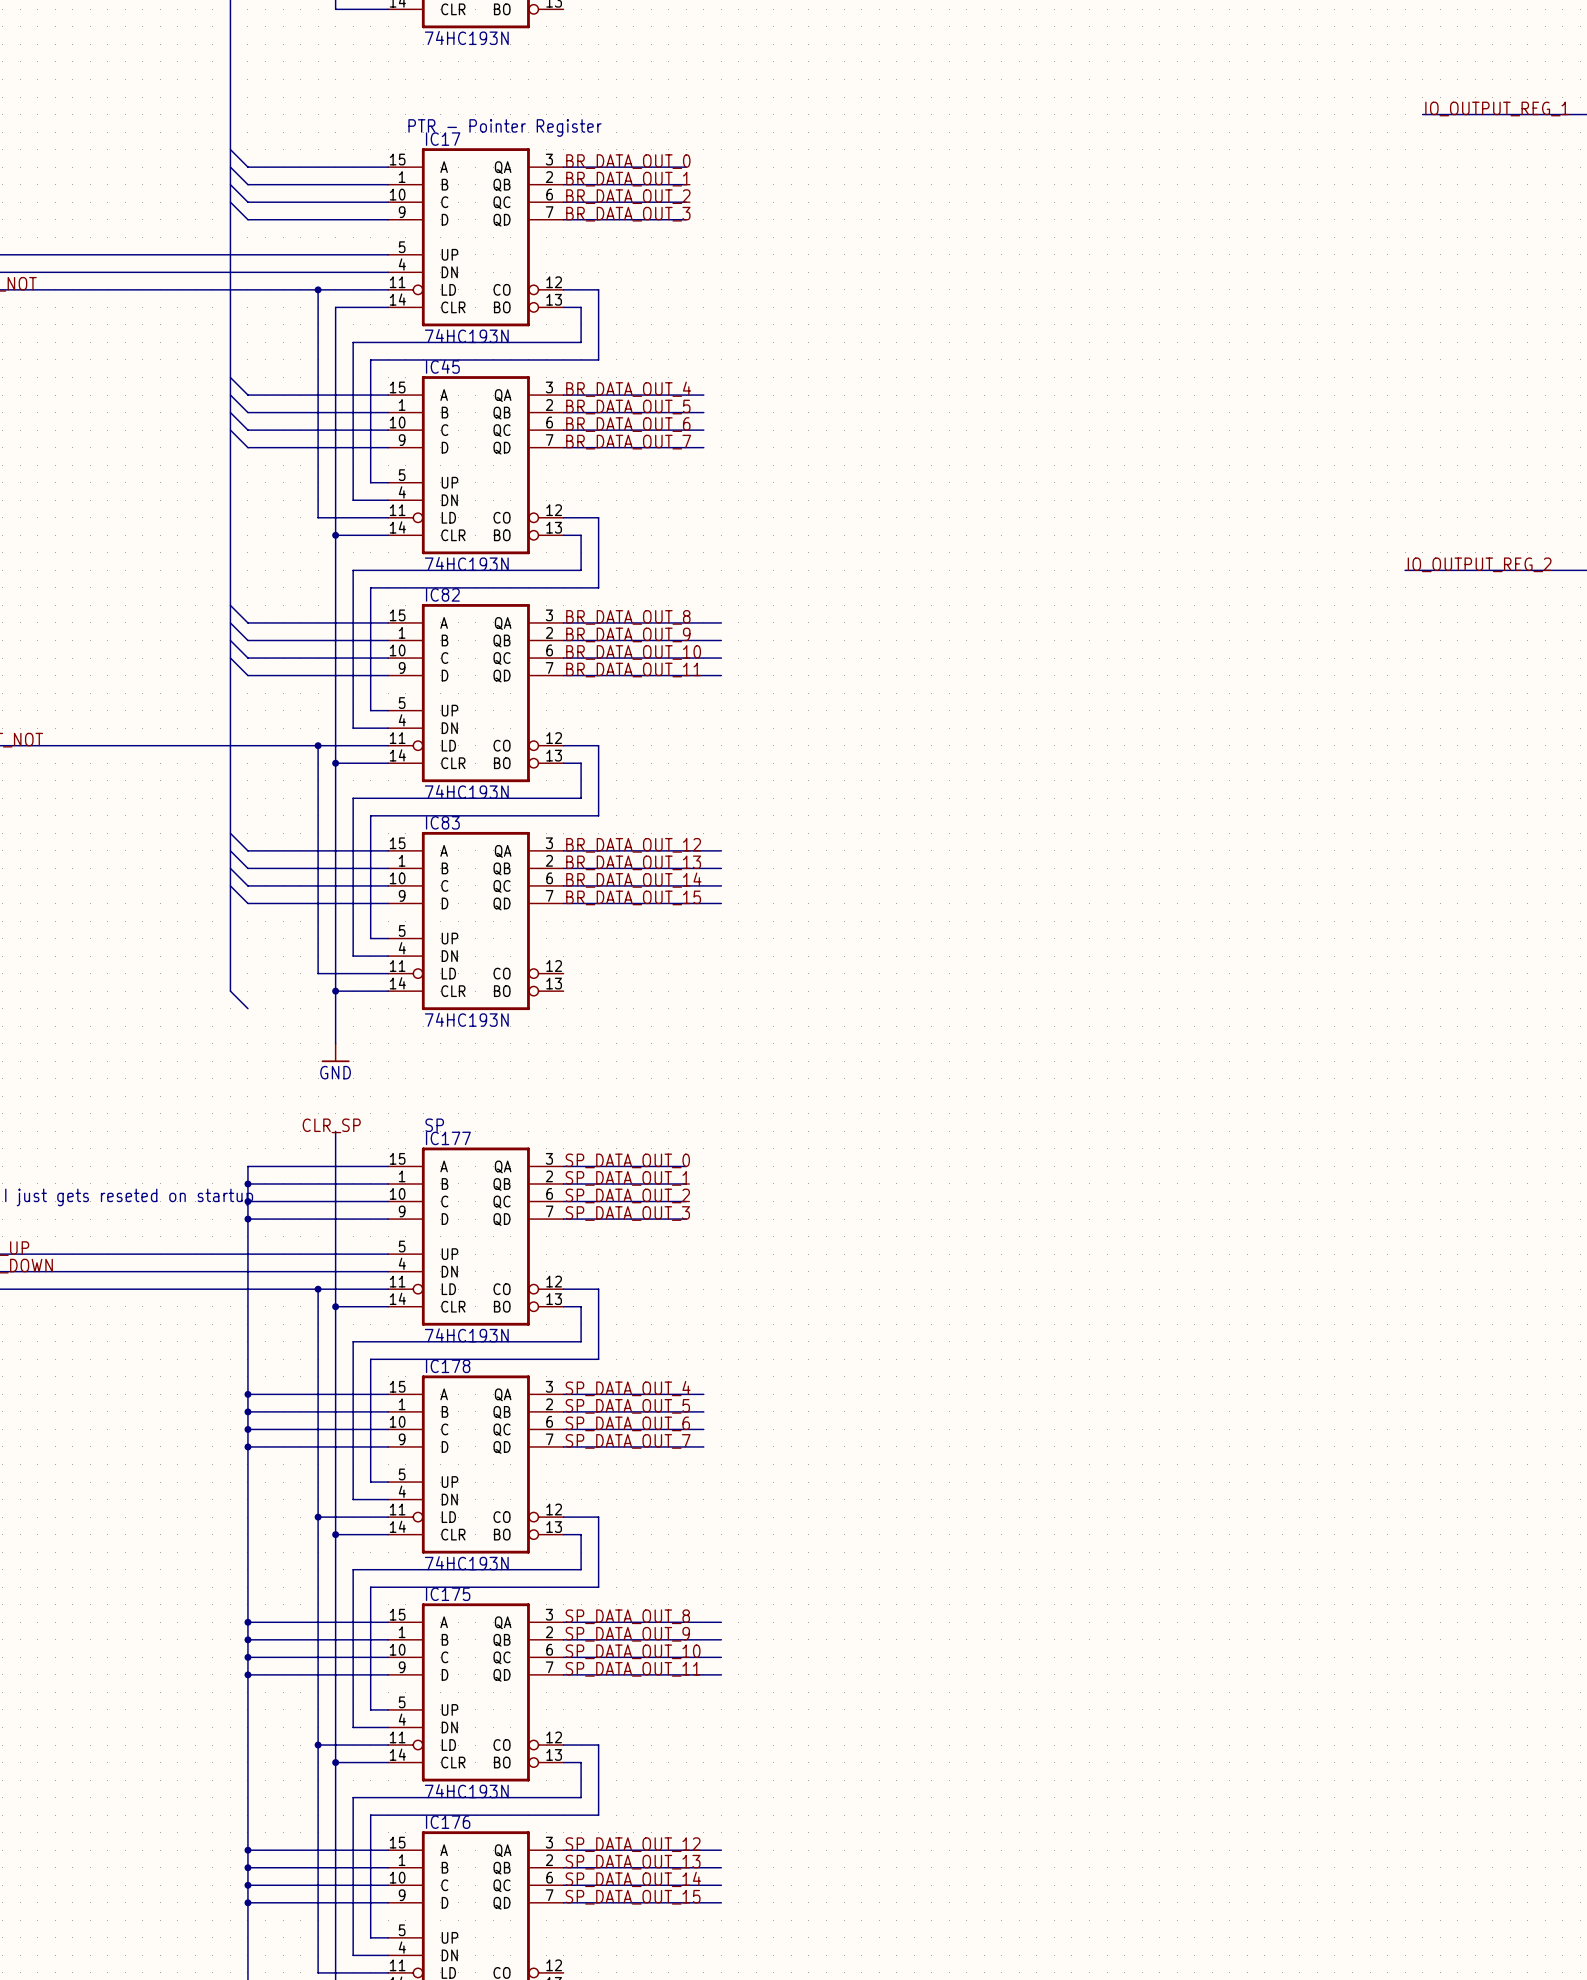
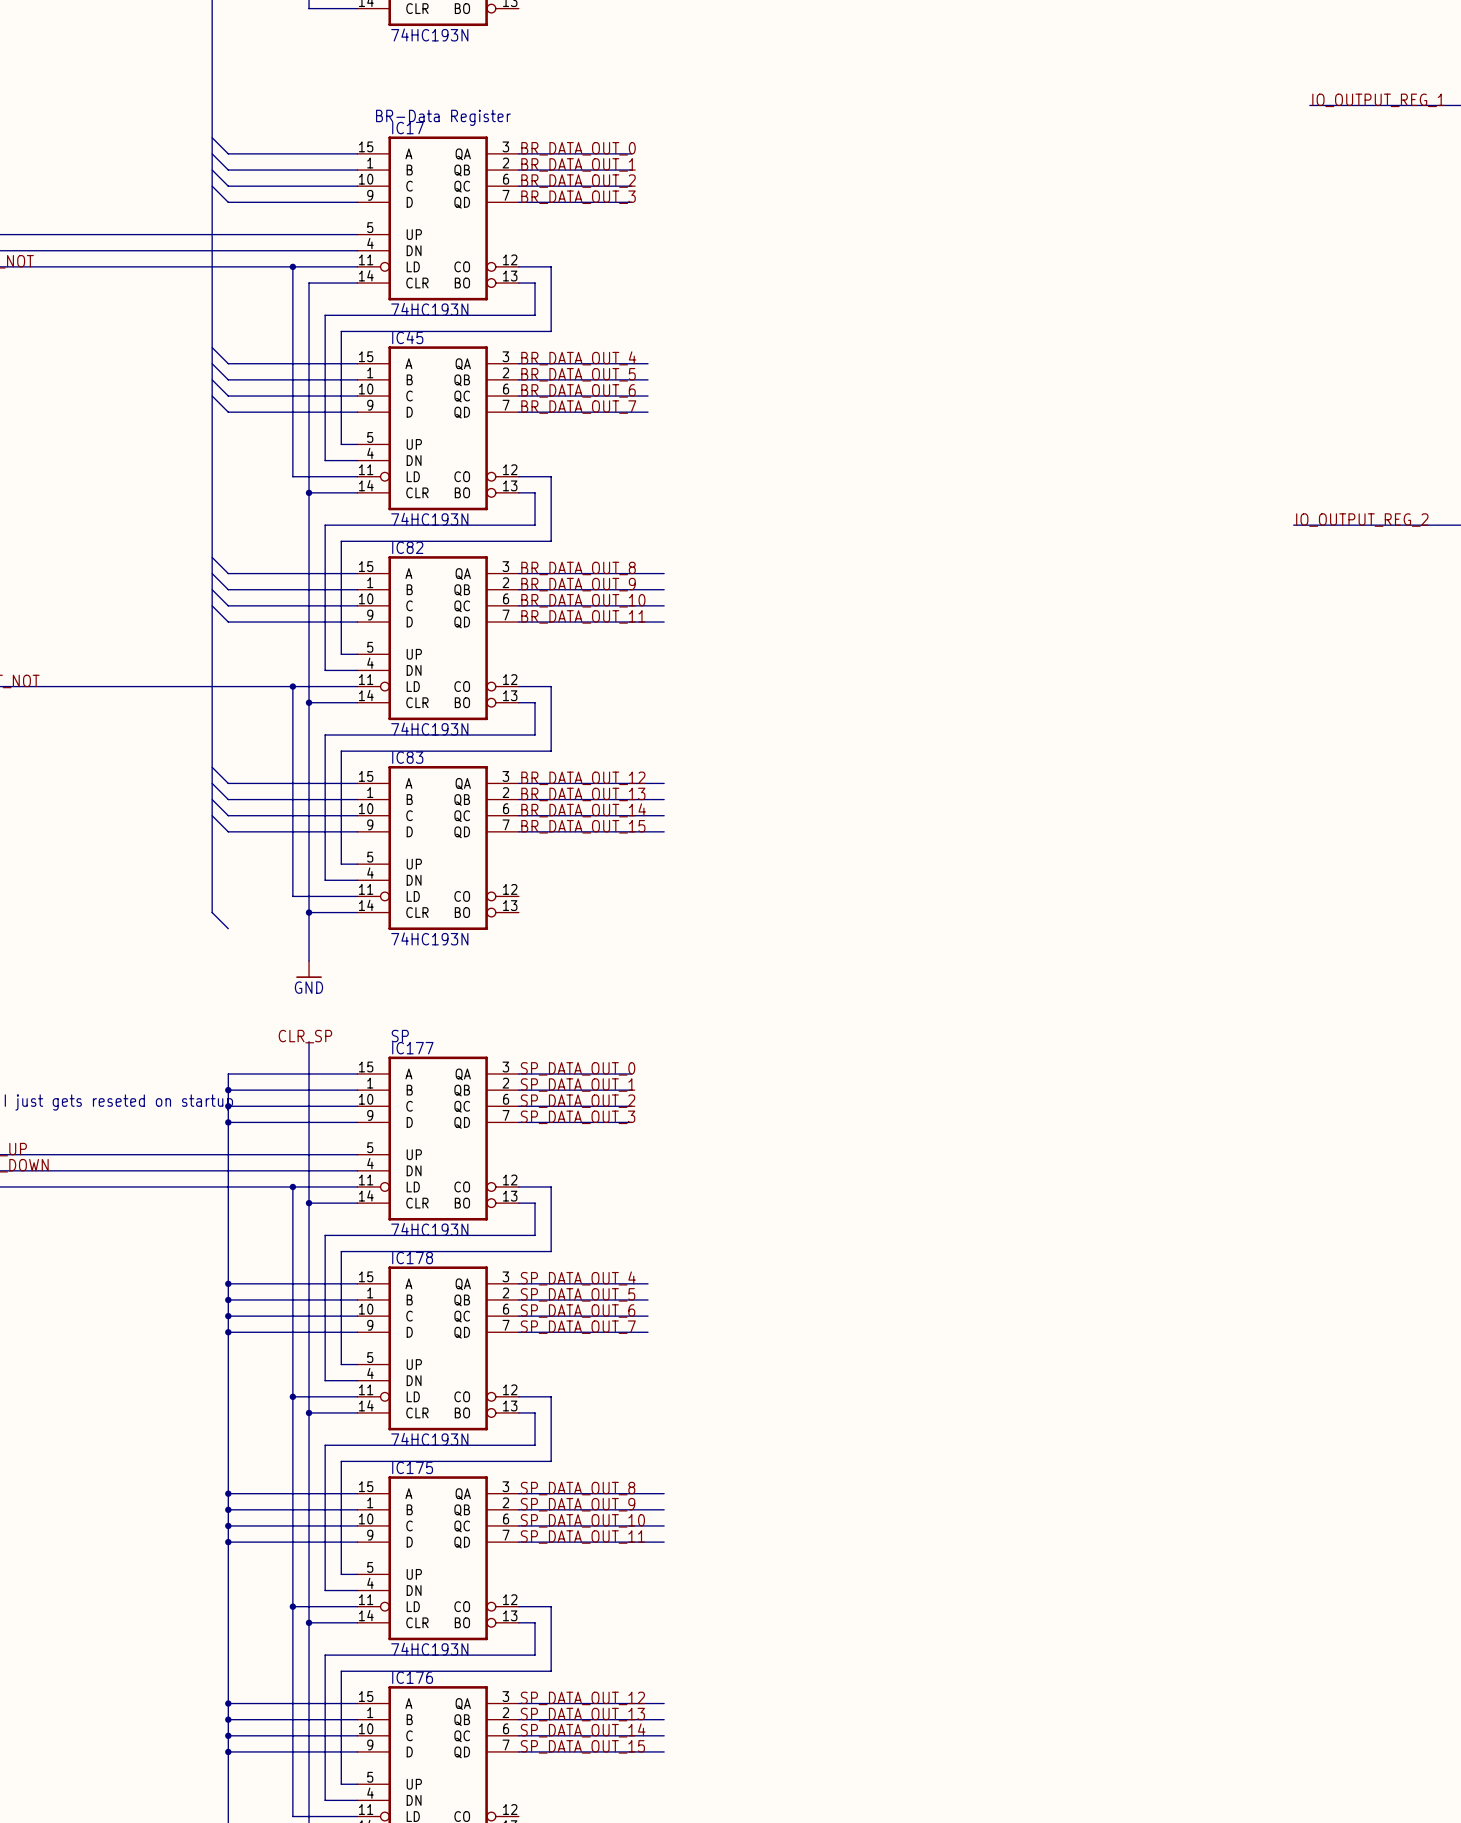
text: PTR - Pointer Register (505, 127) -> BR-Data Register (443, 117)

